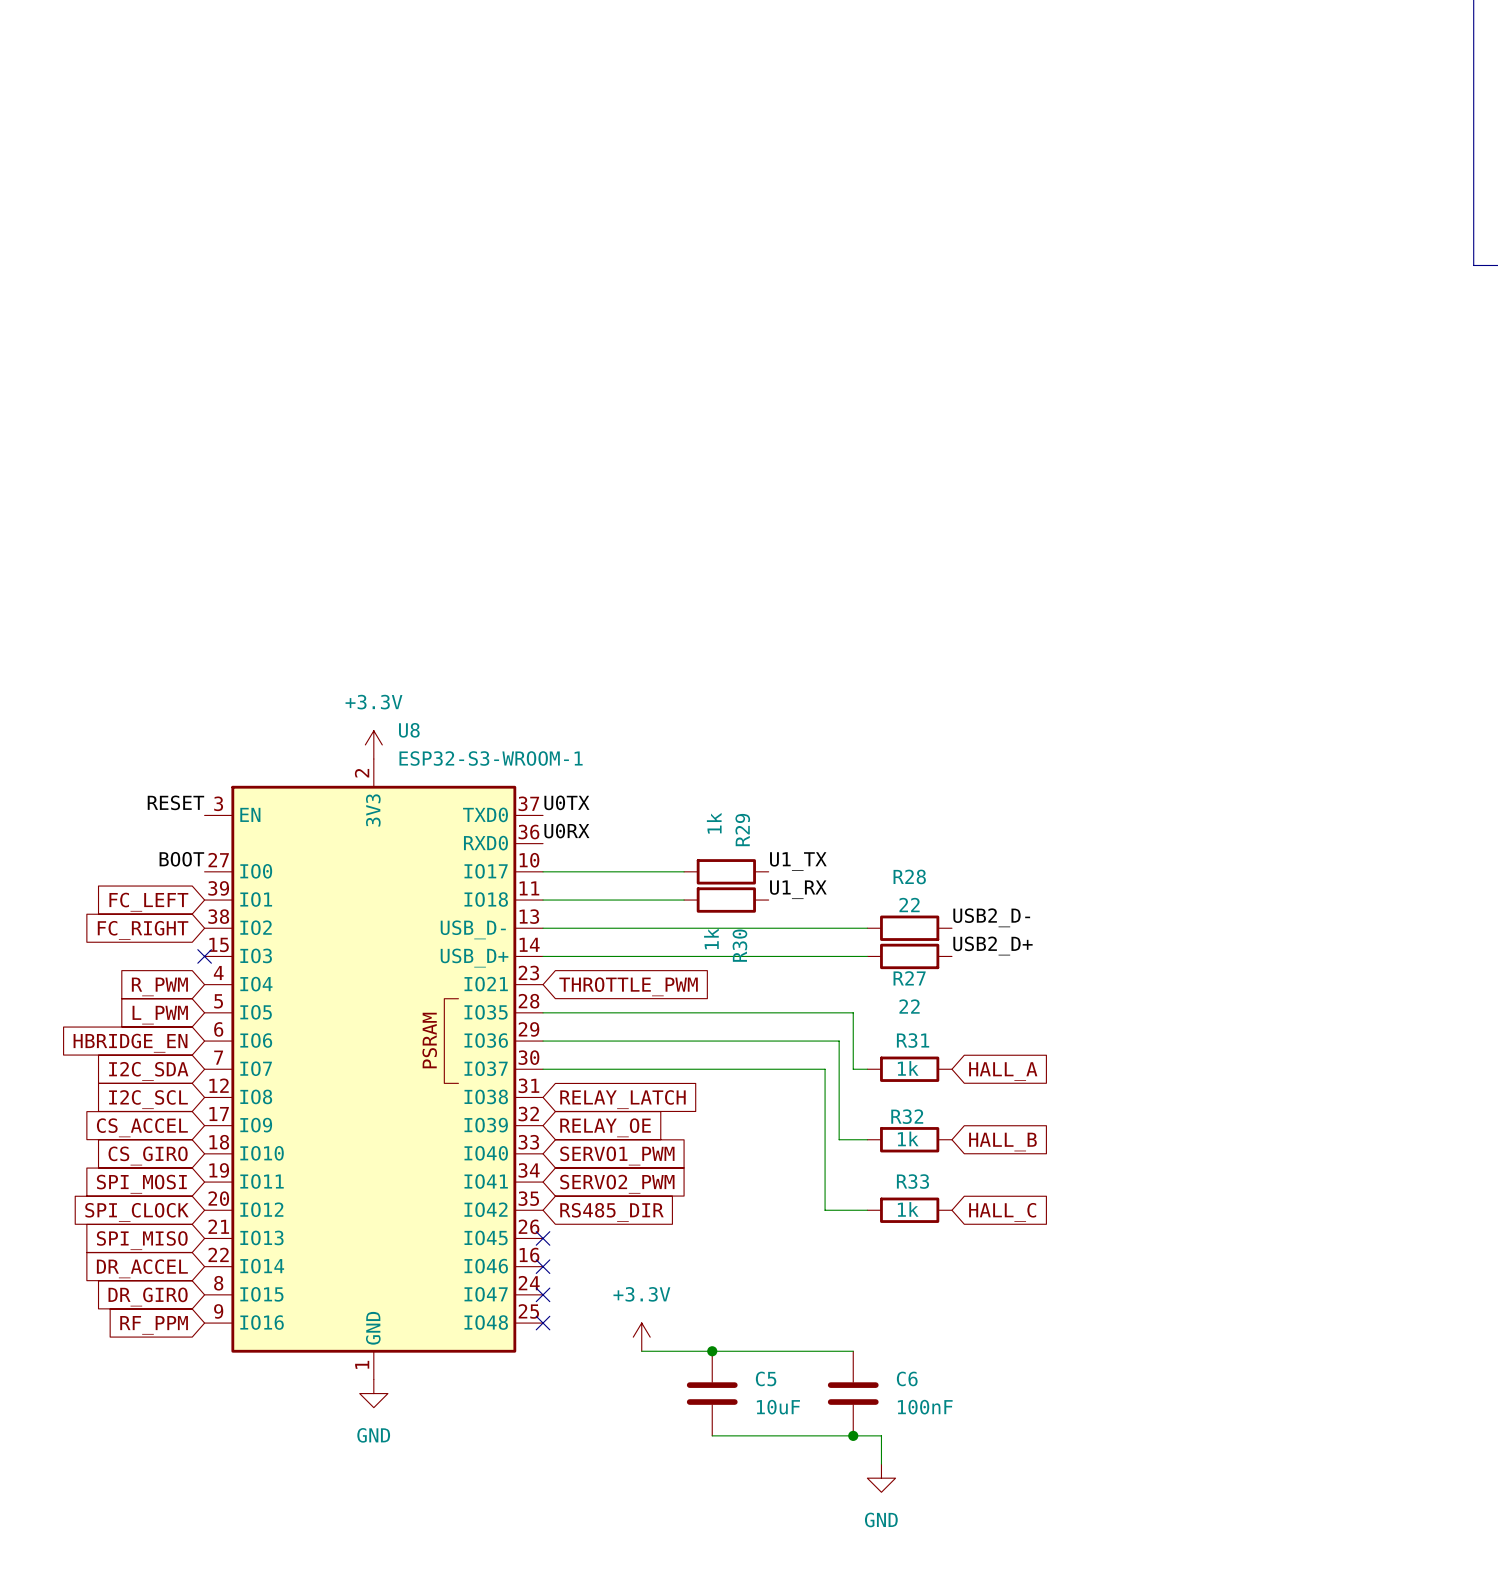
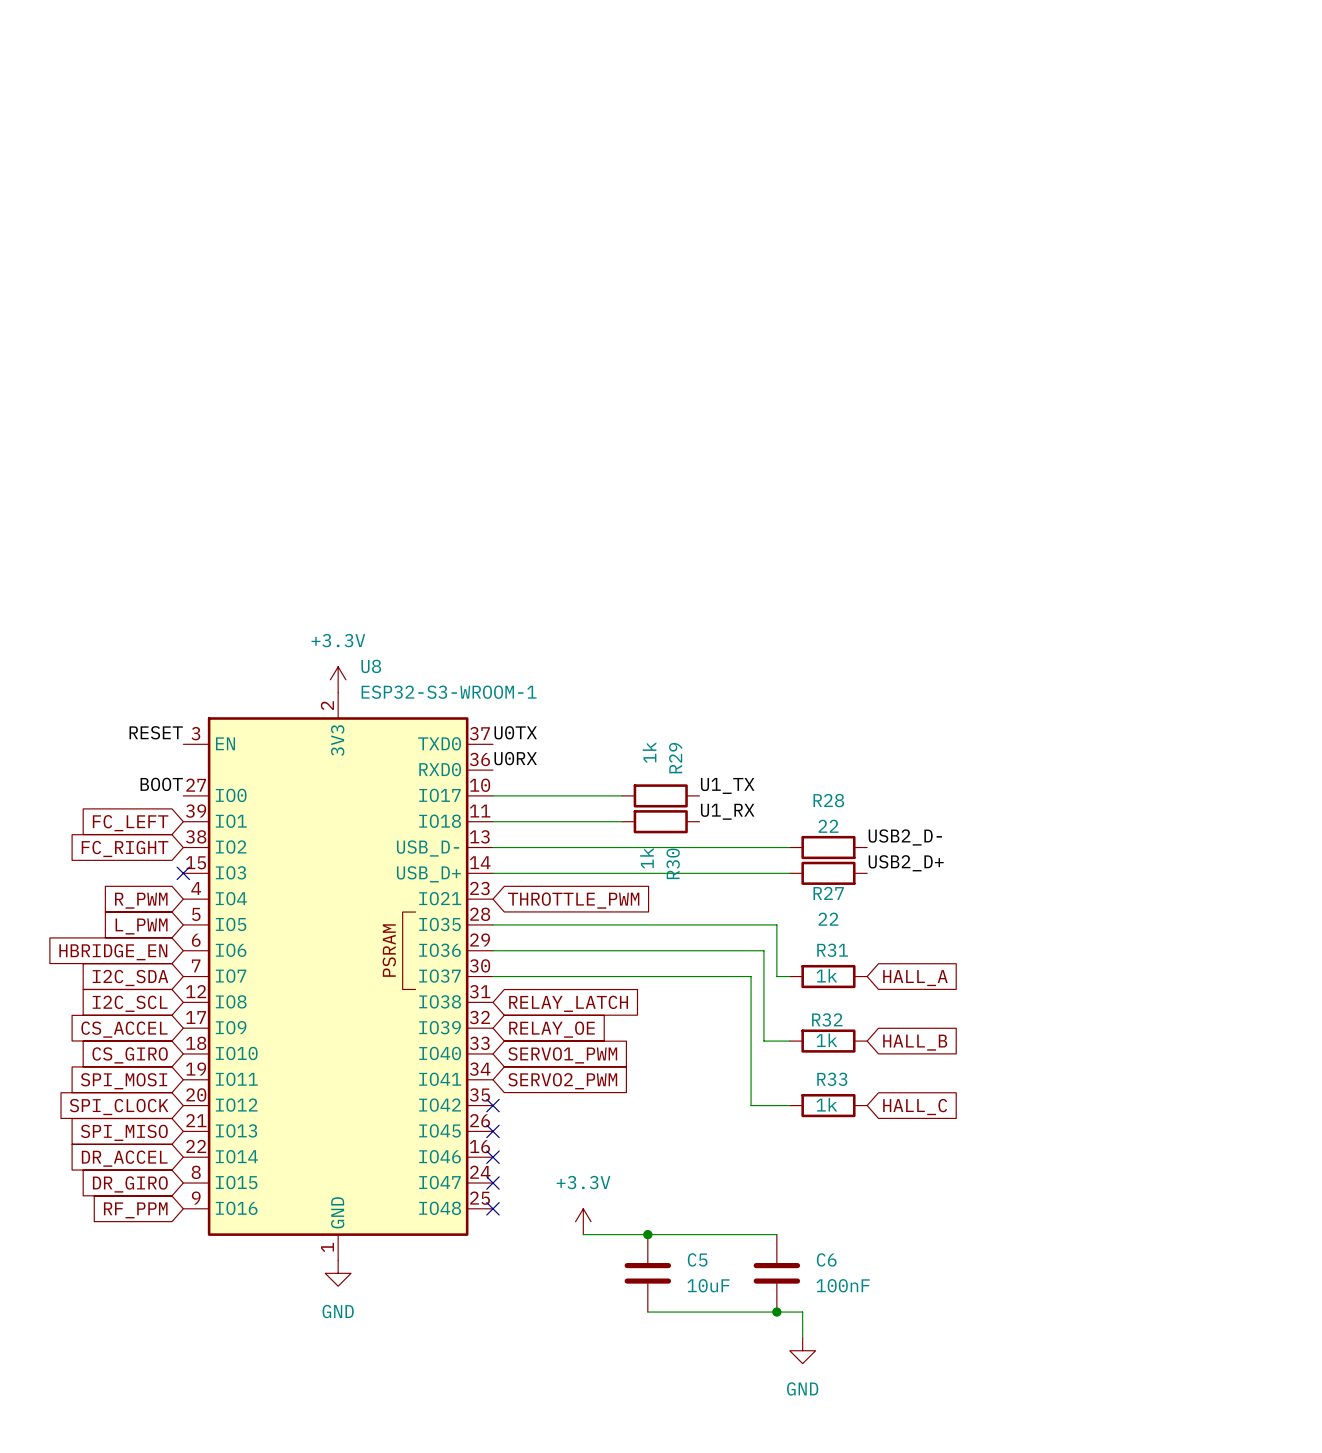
no-connect mark: none -> (492, 1105)
global label: RS485_DIR (611, 1212) -> none

